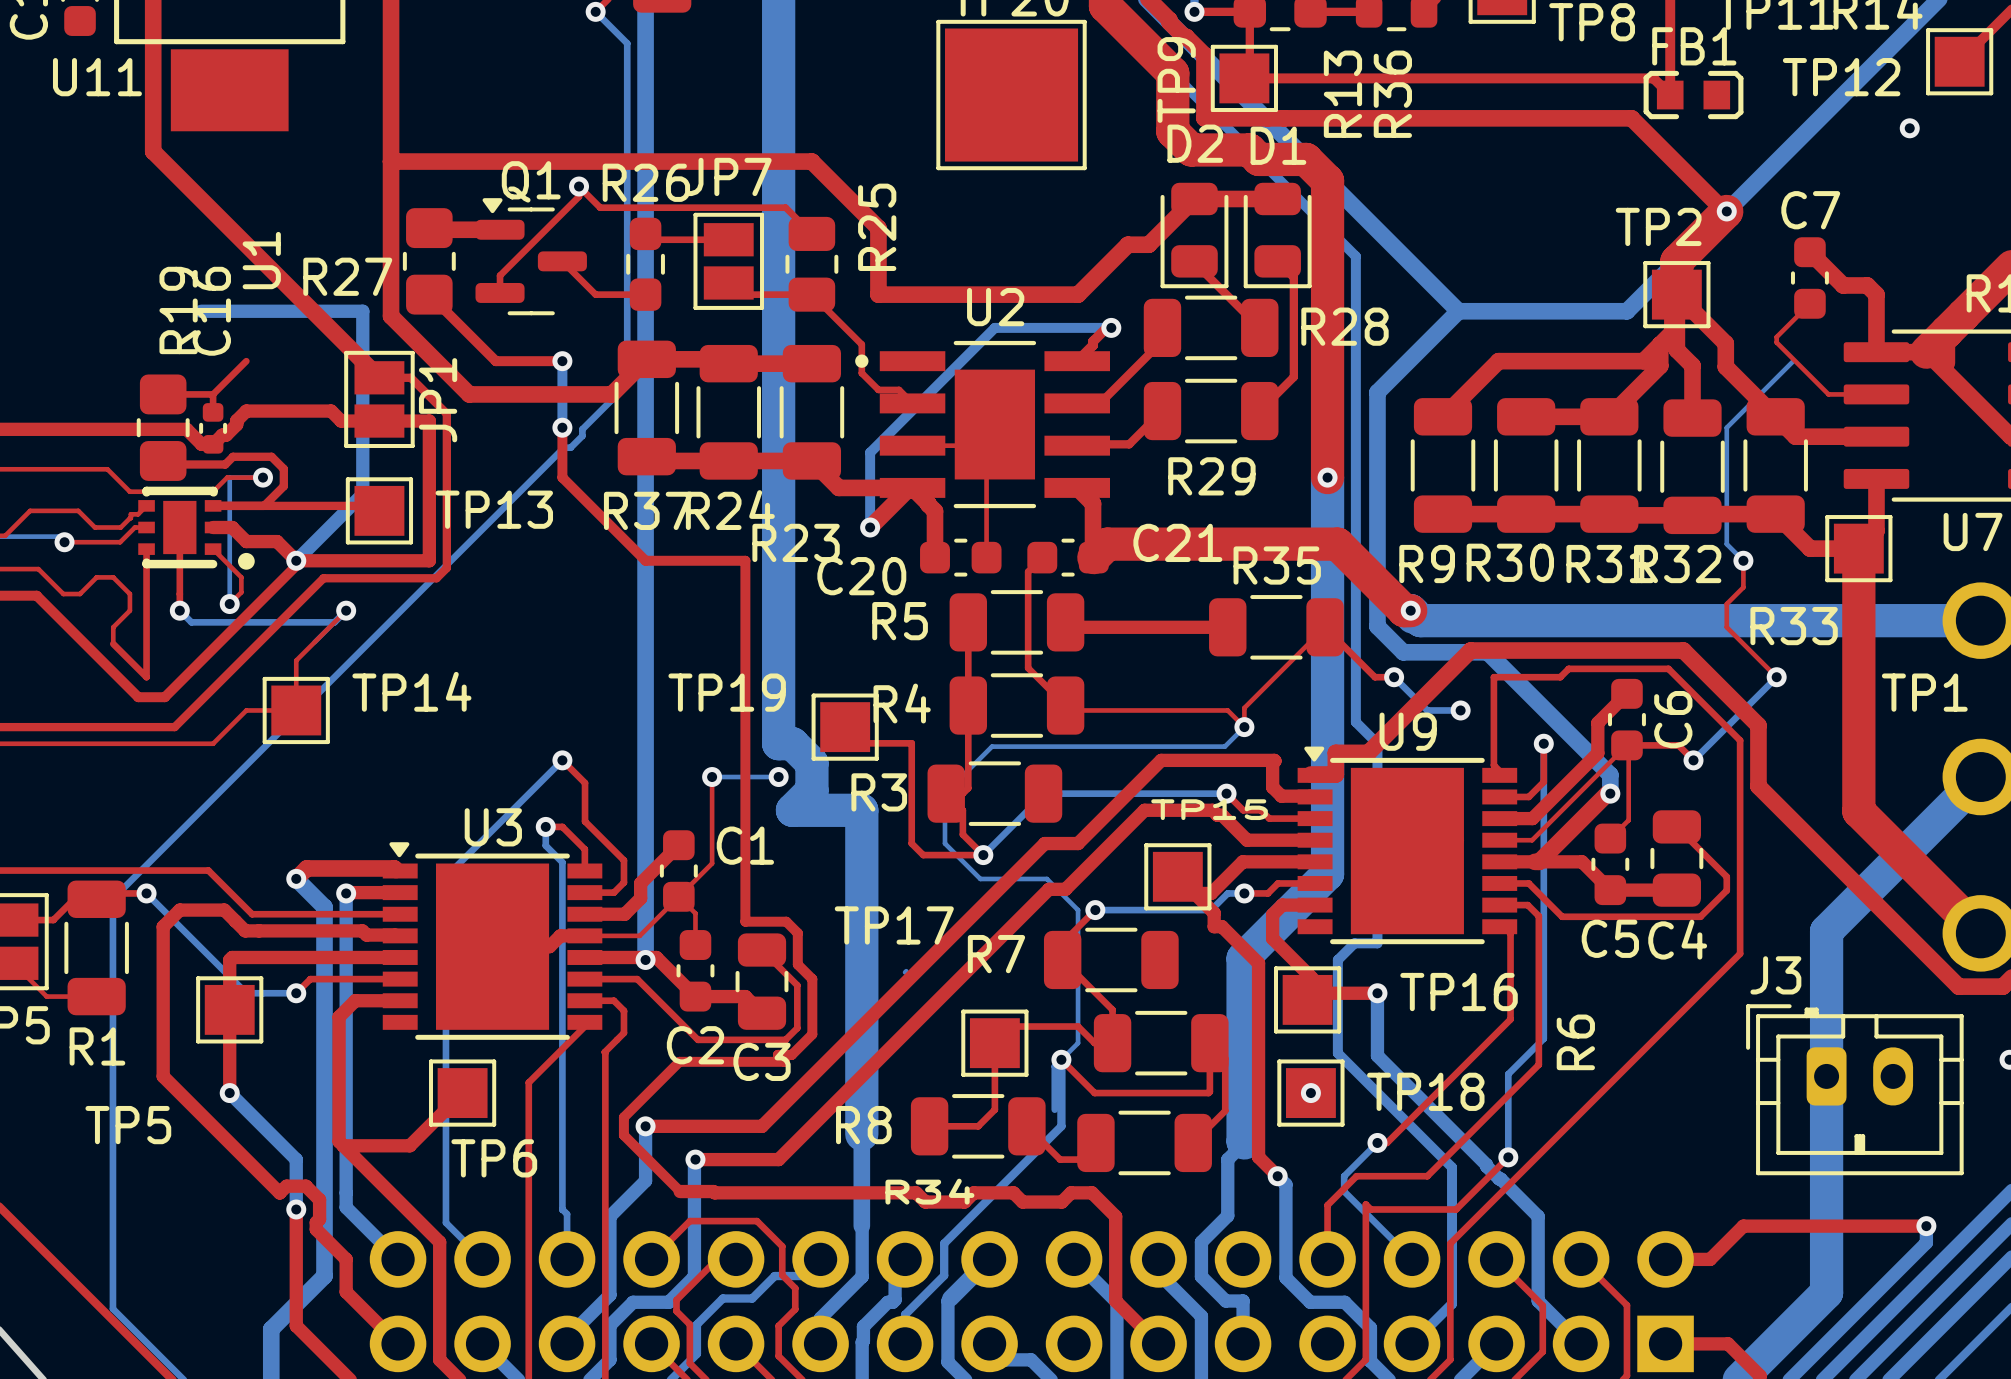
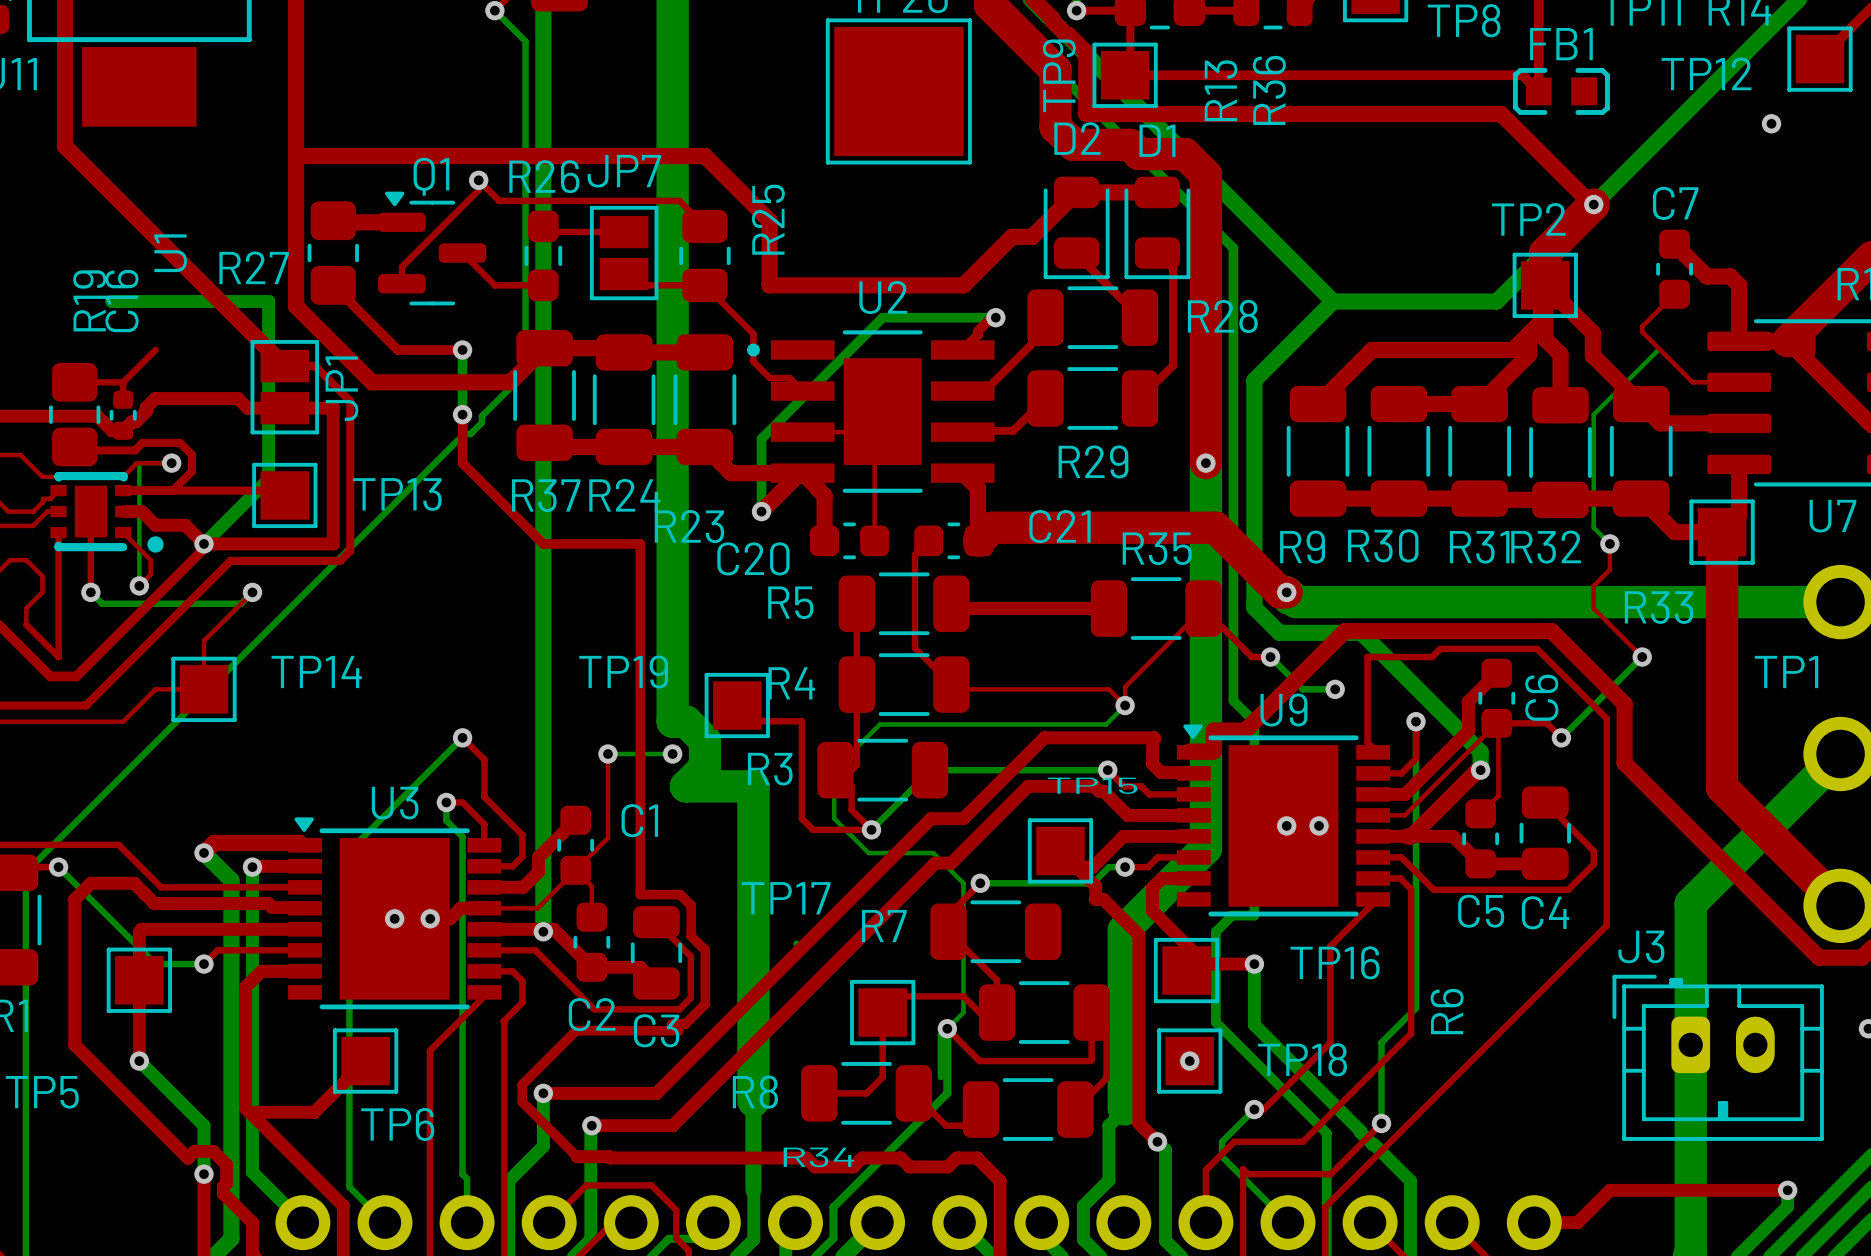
via: none -> (1286, 825)
via: none -> (1319, 825)
top track: (1503, 926) (1510, 933) (1510, 1019) (1455, 1074) -> (1377, 899) (1330, 946) (1330, 1042)
via: none -> (394, 918)
via: none -> (430, 918)

